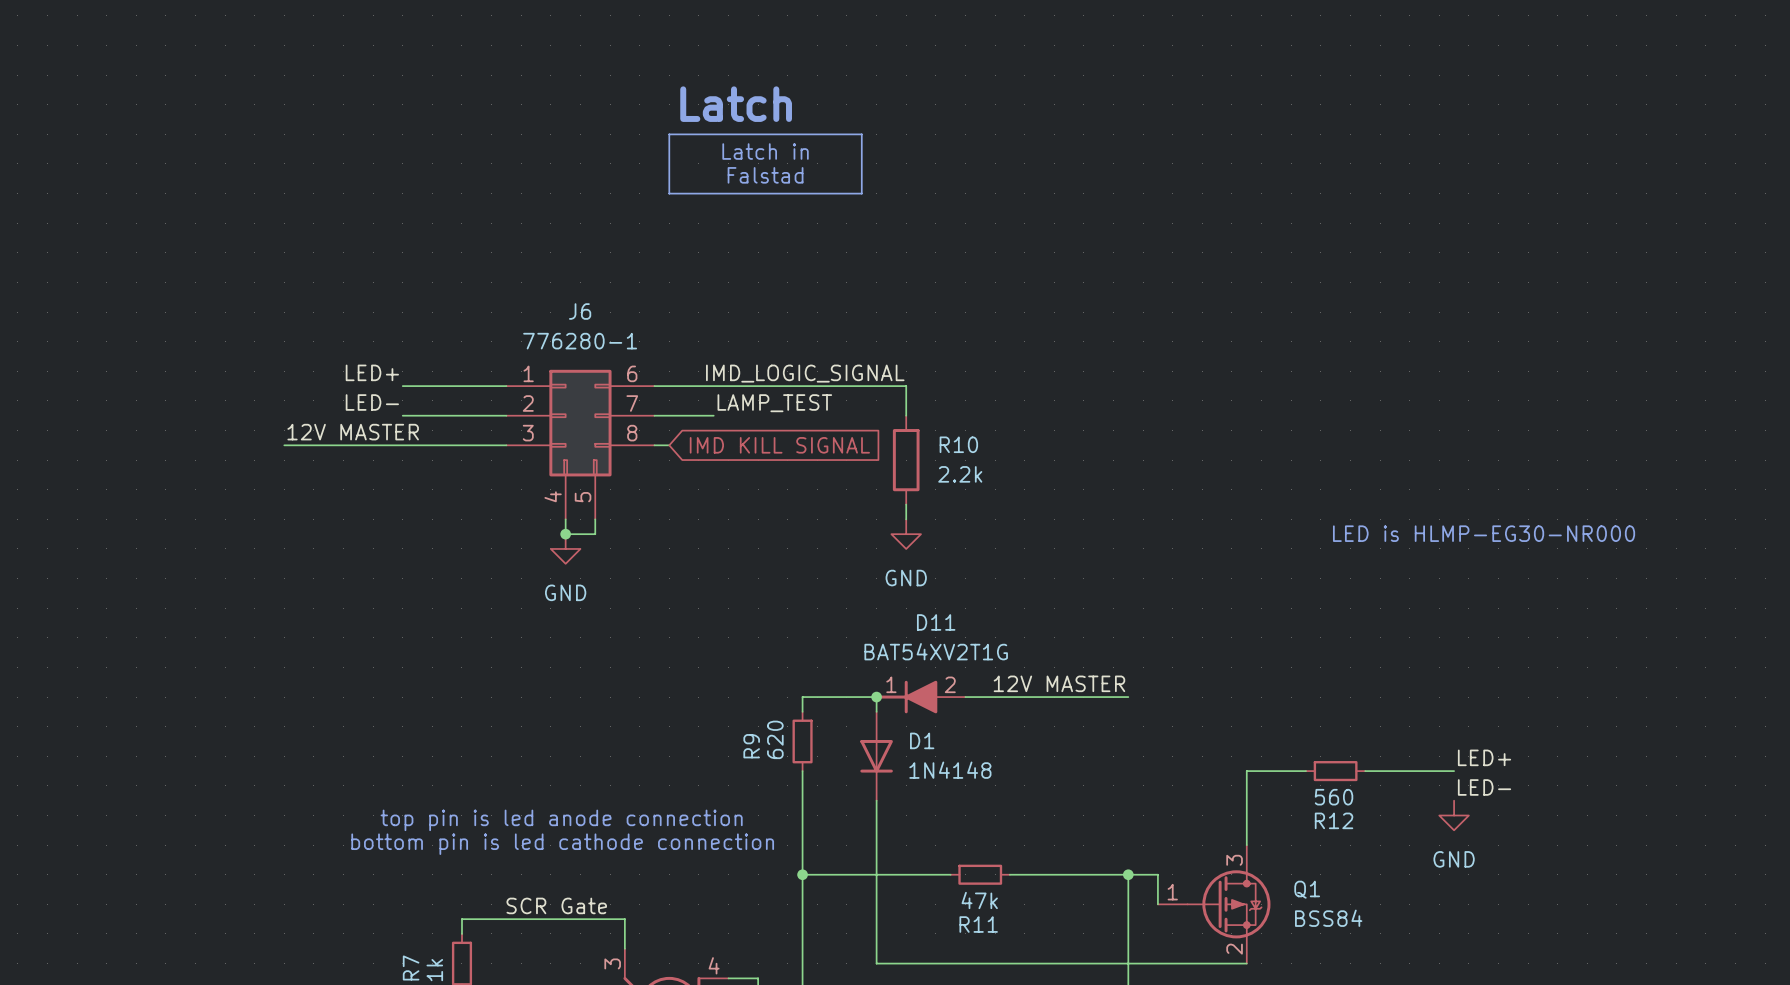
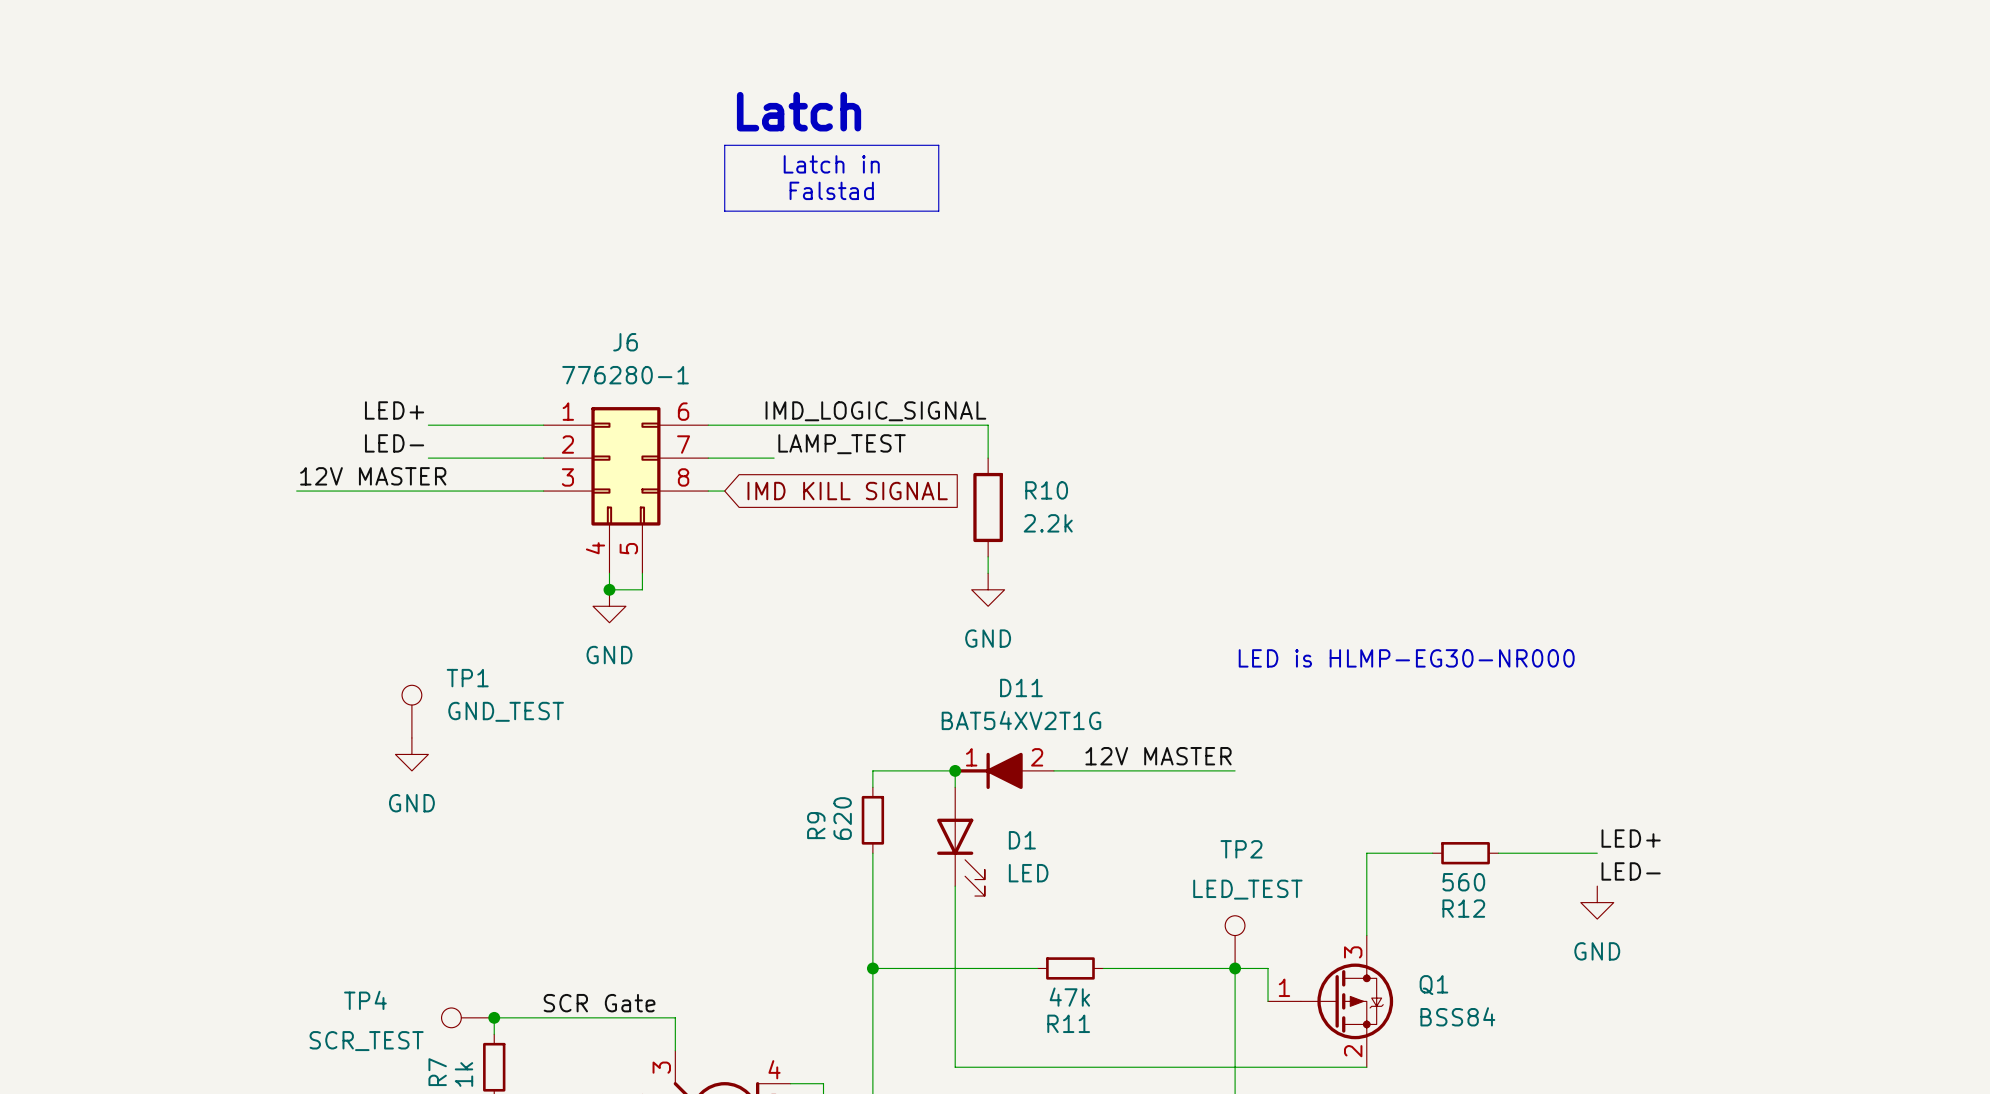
text position: LED is HLMP-EG30-NR000 (1484, 533) -> LED is HLMP-EG30-NR000 (1406, 658)
TP1: none -> GND_TEST (411, 711)
power symbol: none -> GND (411, 754)
D1 symbol: [860, 711, 893, 801] -> [937, 787, 985, 897]
D1 value: 1N4148 (950, 770) -> LED (1028, 873)
text: top pin is led anode connection (561, 820) -> none
text: bottom pin is led cathode connection (562, 844) -> none
TP2: none -> LED_TEST (1235, 942)
TP4: none -> SCR_TEST (467, 1017)
junction: none -> (494, 1017)

